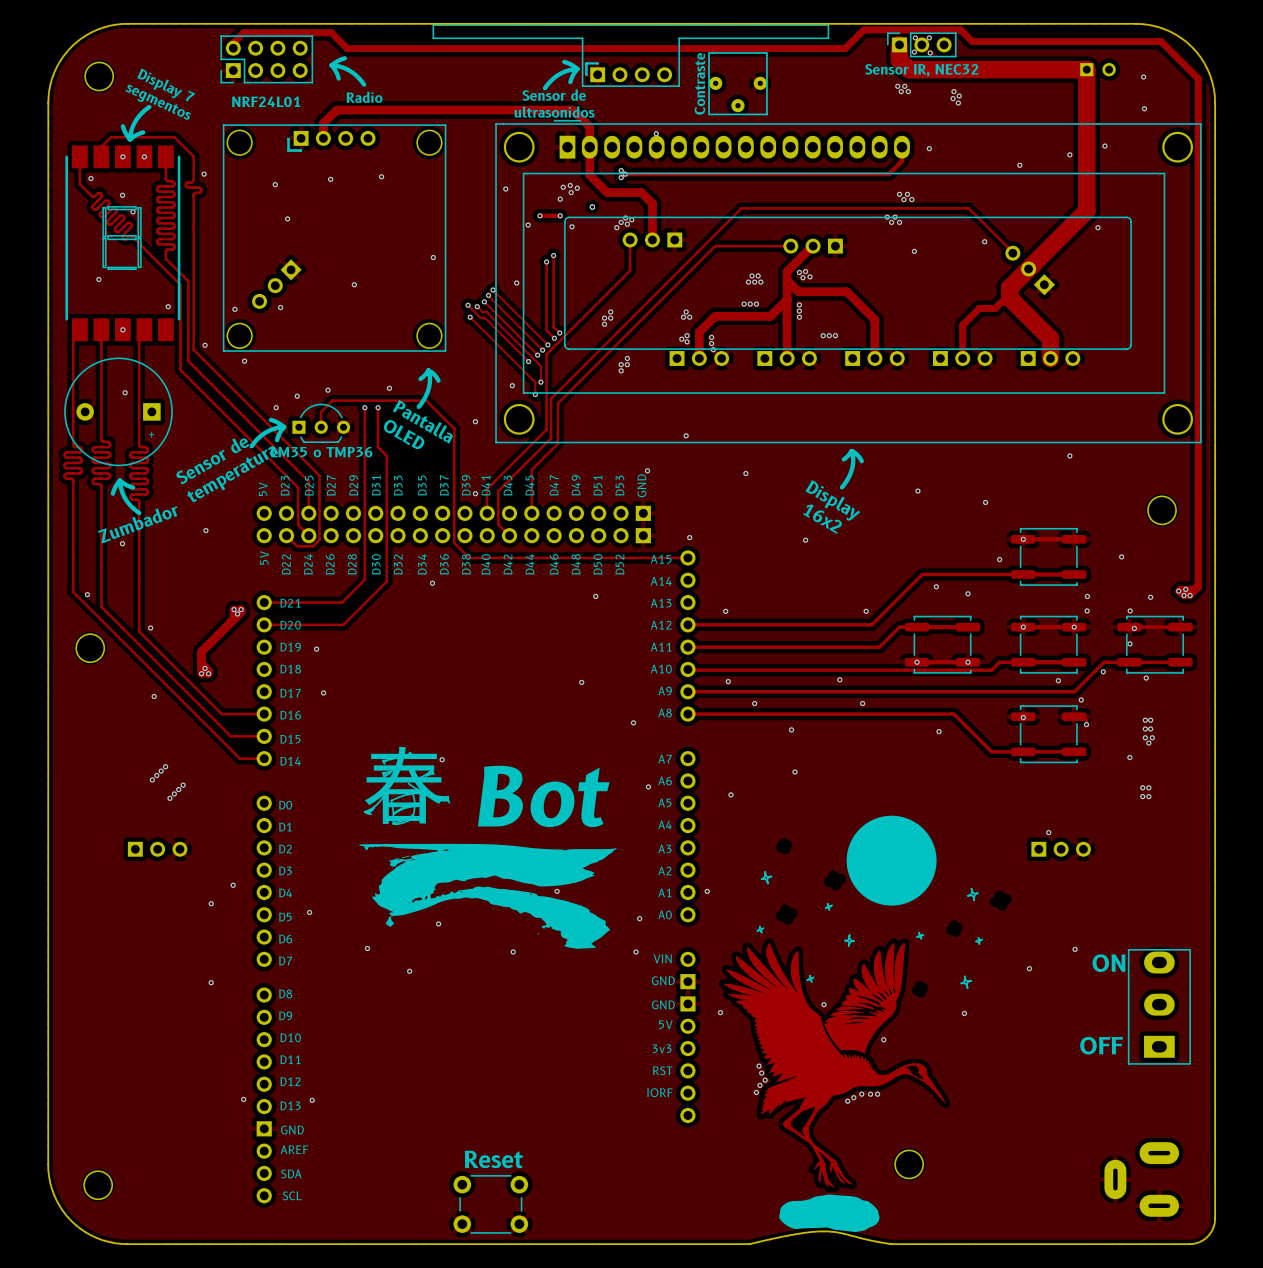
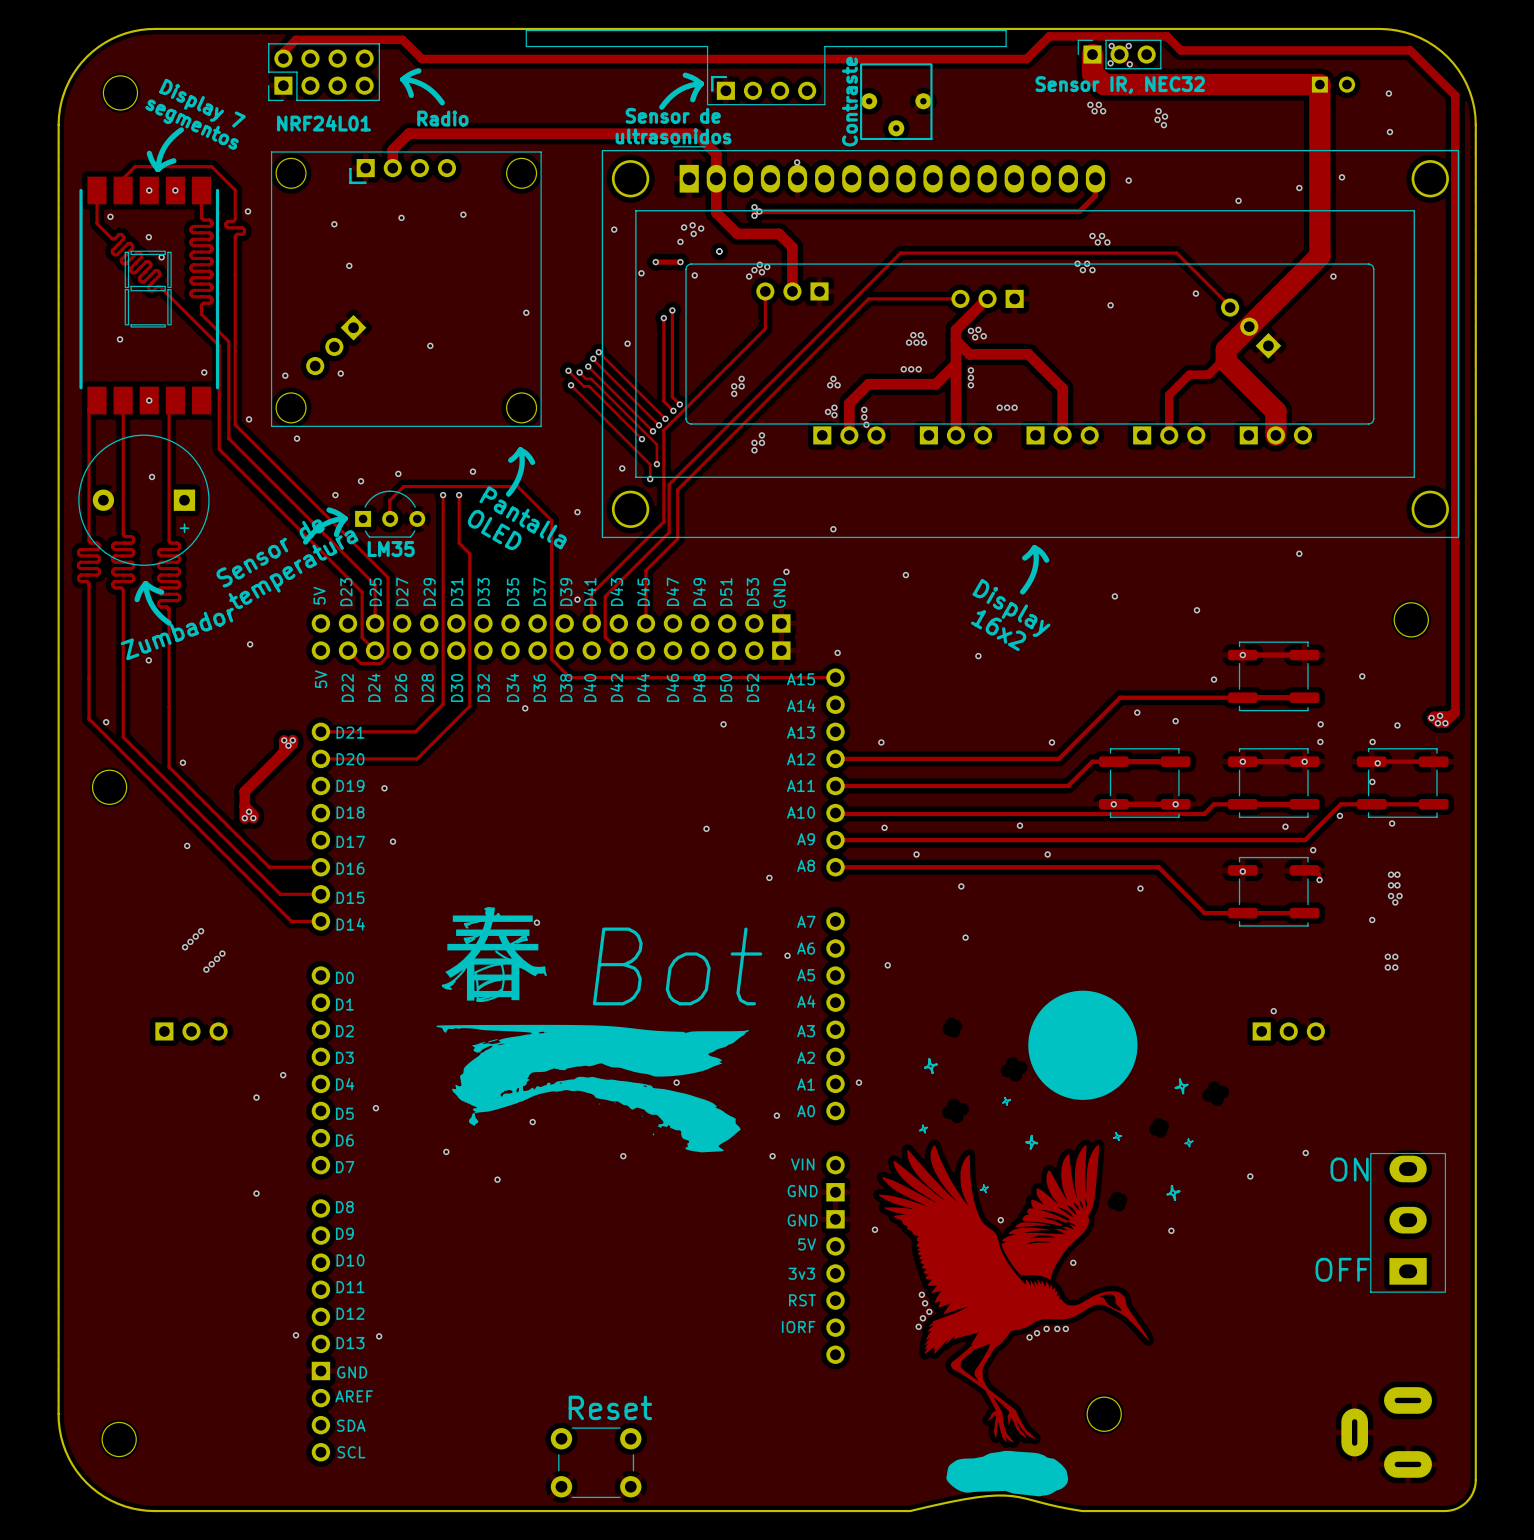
text: LM35 o TMP36 (321, 452) -> LM35 (391, 548)

